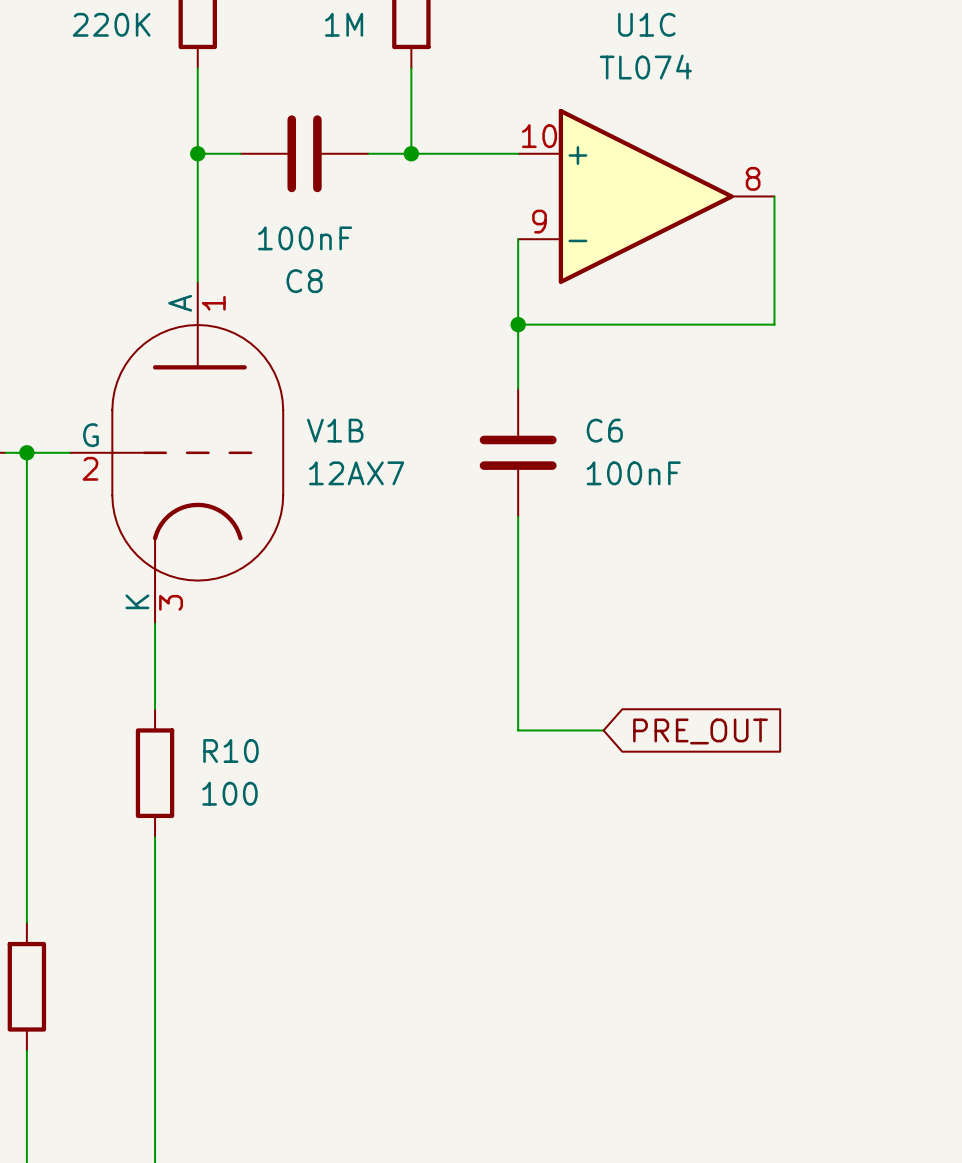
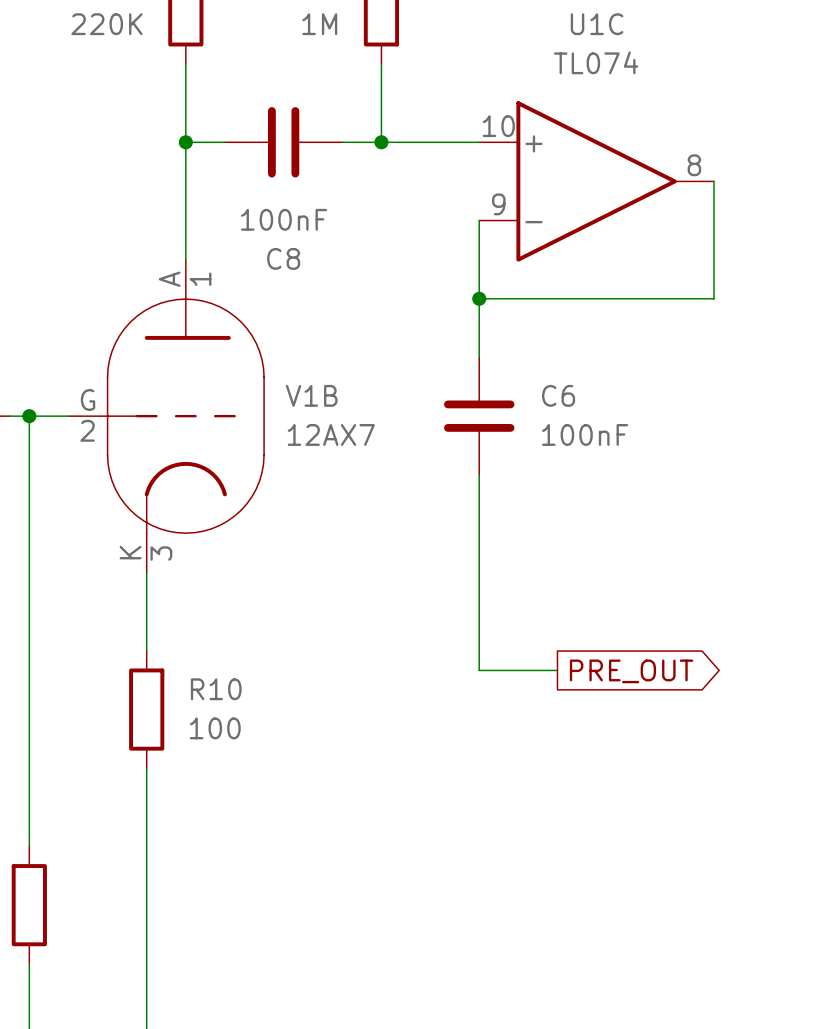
global label shape: input (700, 731) -> output (631, 671)

